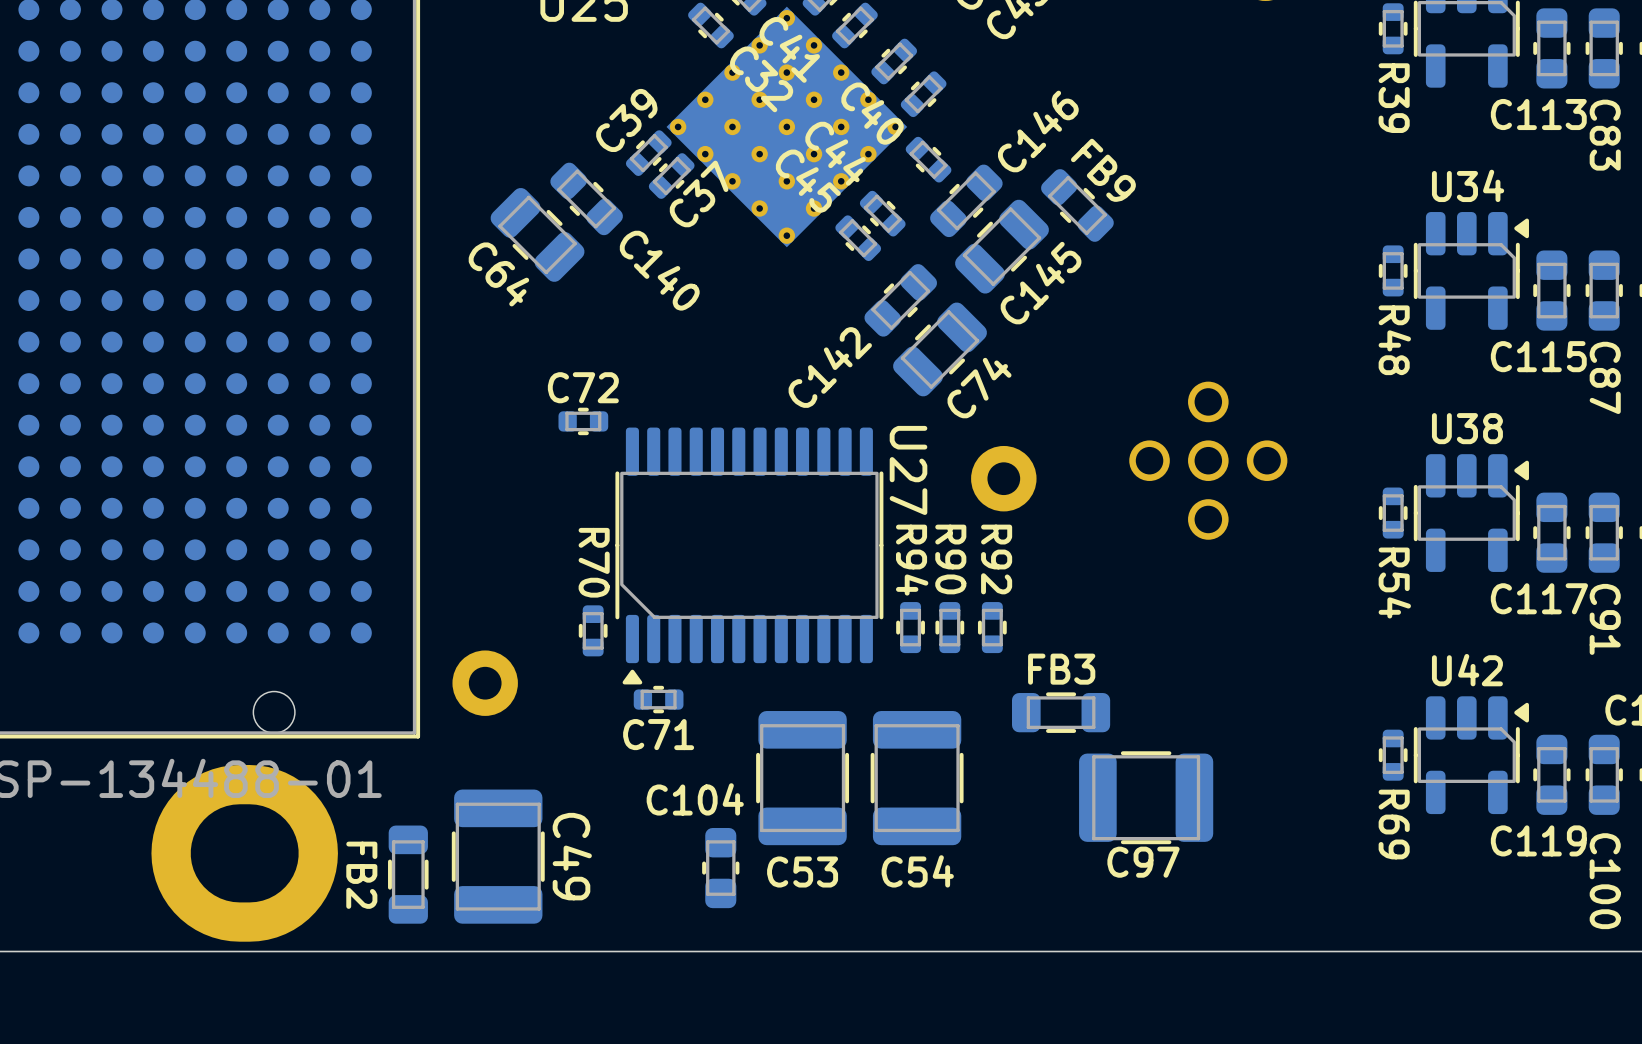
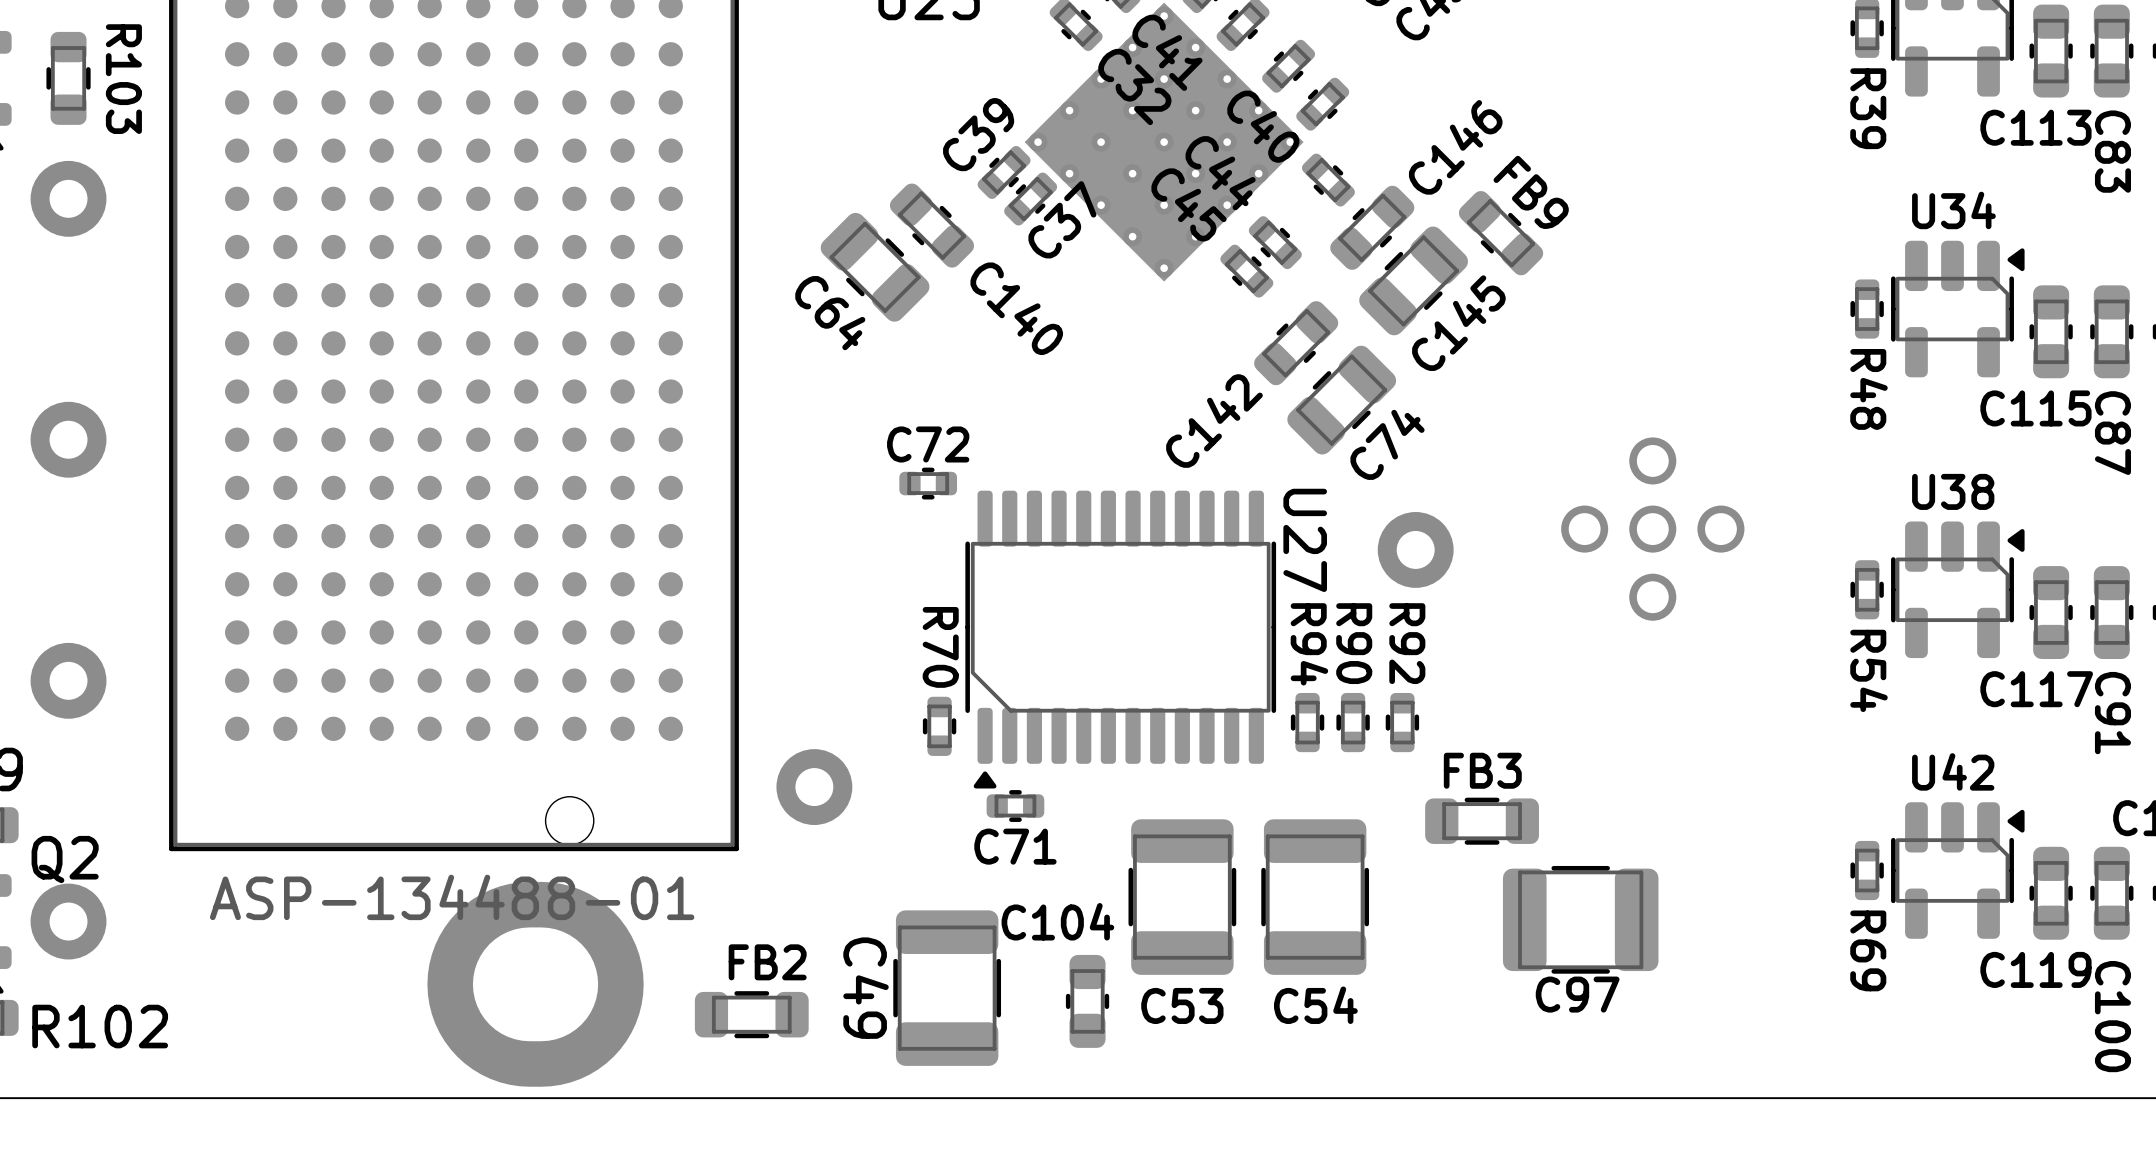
C49 position: (498, 856) -> (947, 988)
C49 name position: C49 (572, 856) -> C49 (866, 988)
FB2 rotation: 0° (408, 874) -> 90° clockwise (751, 1014)

